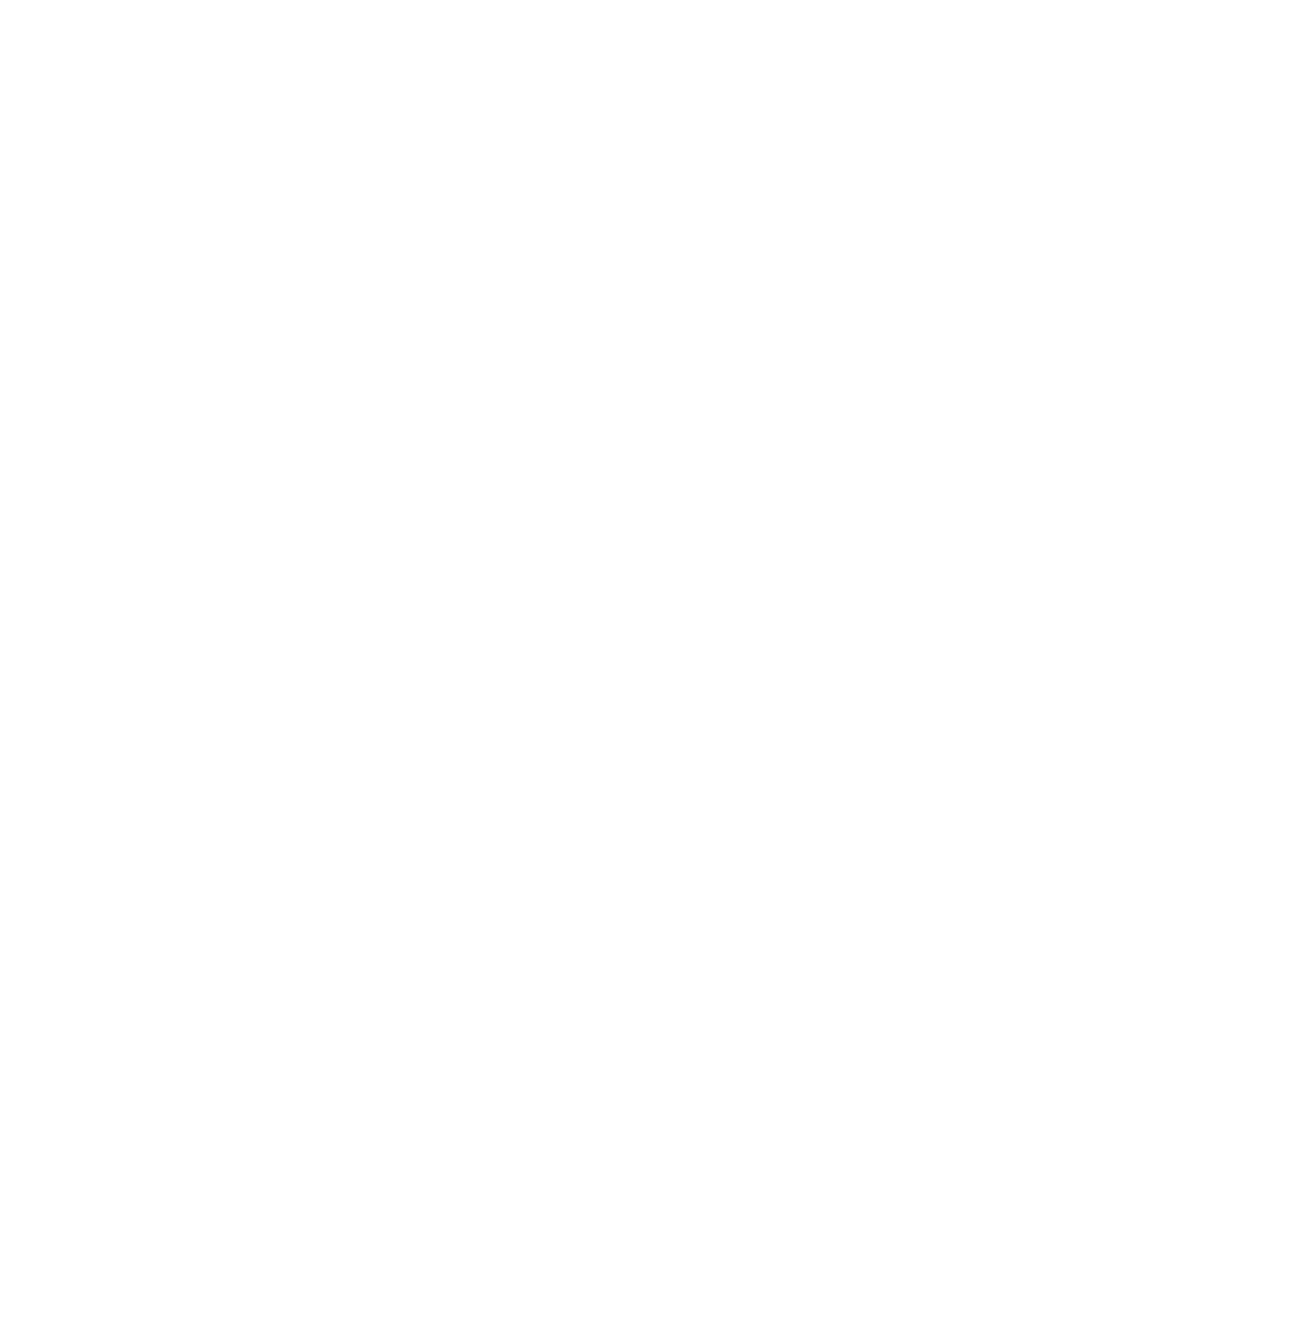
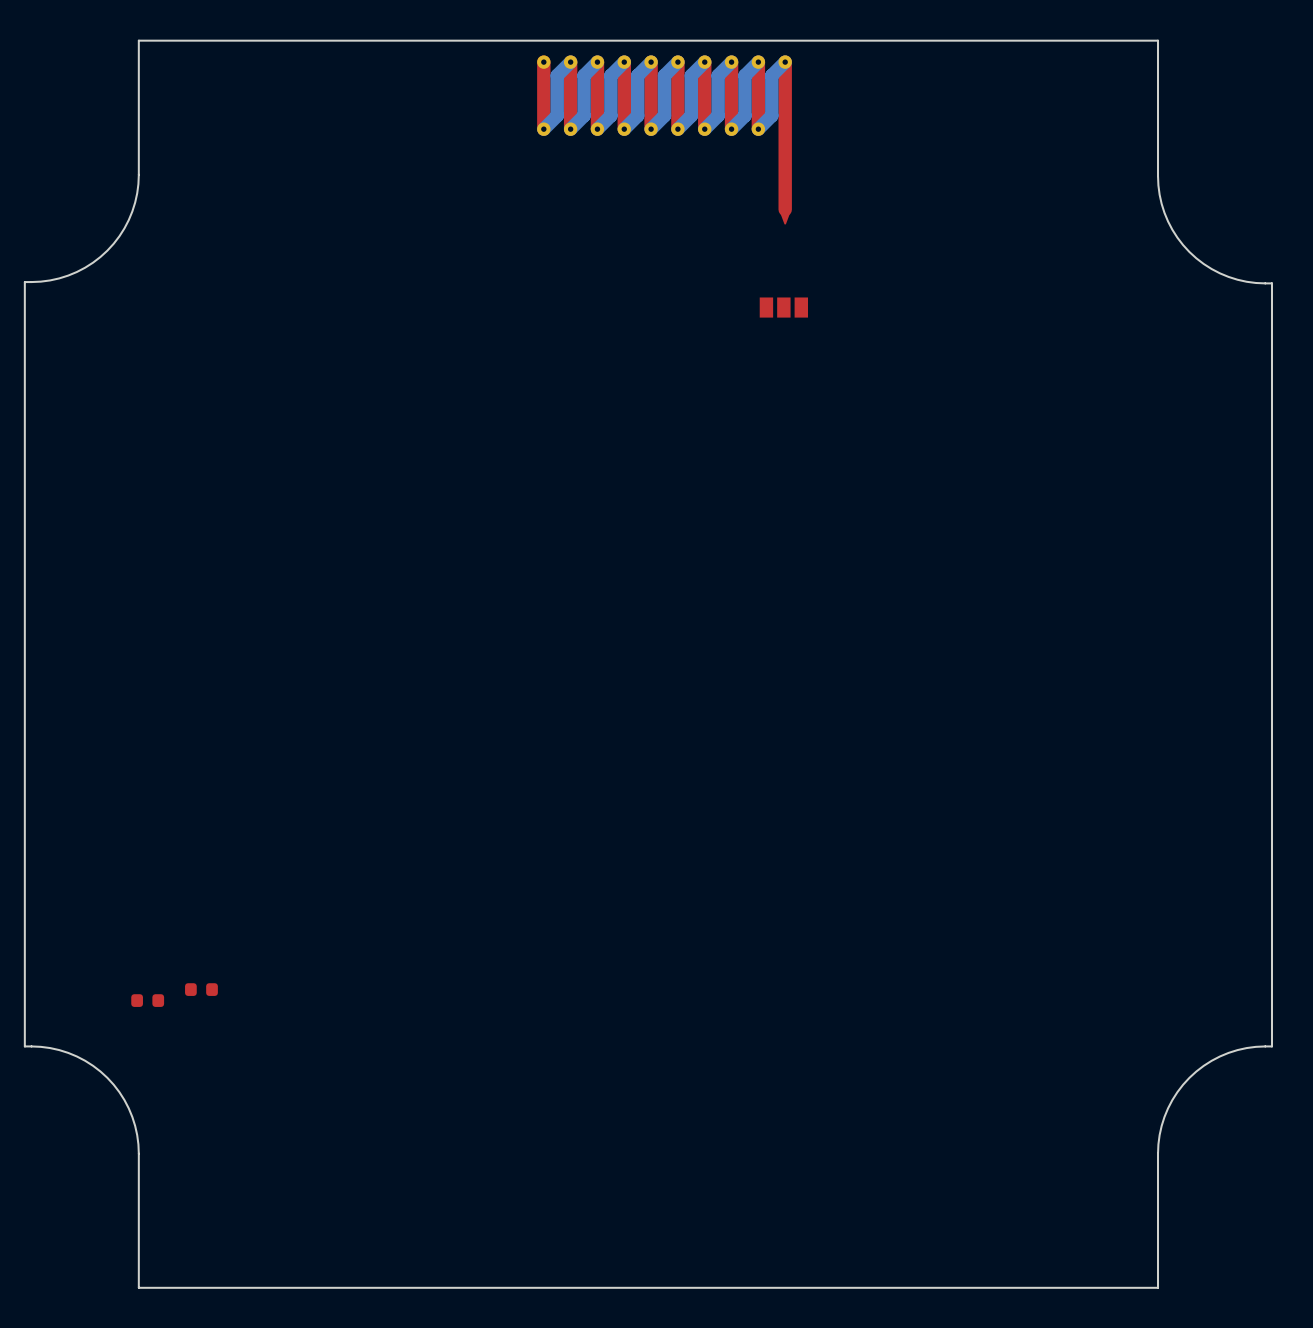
board edge: none -> (1158, 40) (1158, 185) (1161, 203) (1168, 221) (1177, 237) (1189, 251) (1211, 269) (1237, 279) (1271, 283) (1271, 1046) (1237, 1050) (1211, 1060) (1189, 1077) (1177, 1092) (1168, 1108) (1161, 1125) (1158, 1144) (1158, 1287) (138, 1287) (138, 1144) (135, 1125) (128, 1108) (119, 1092) (107, 1077) (85, 1060) (59, 1050) (24, 1046) (24, 282) (59, 278) (85, 267) (107, 250) (119, 236) (128, 220) (135, 202) (138, 184) (138, 40) (1158, 40)
part: none -> (664, 139)
part: none -> (783, 307)
part: none -> (201, 989)
part: none -> (147, 1000)

